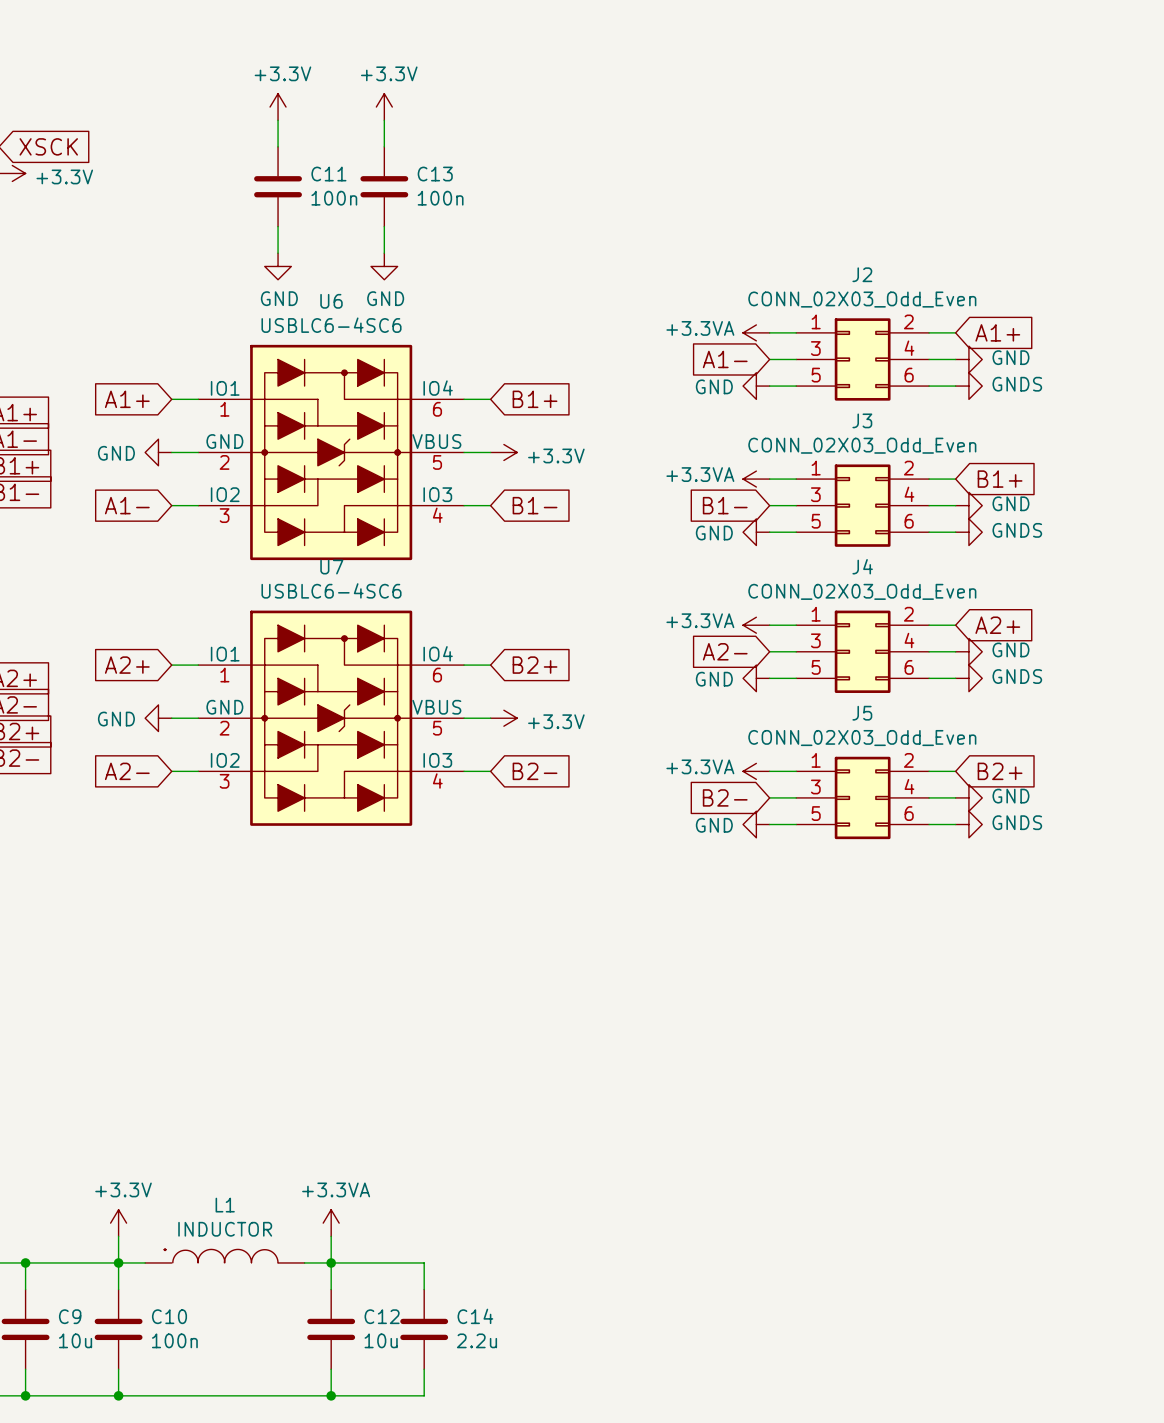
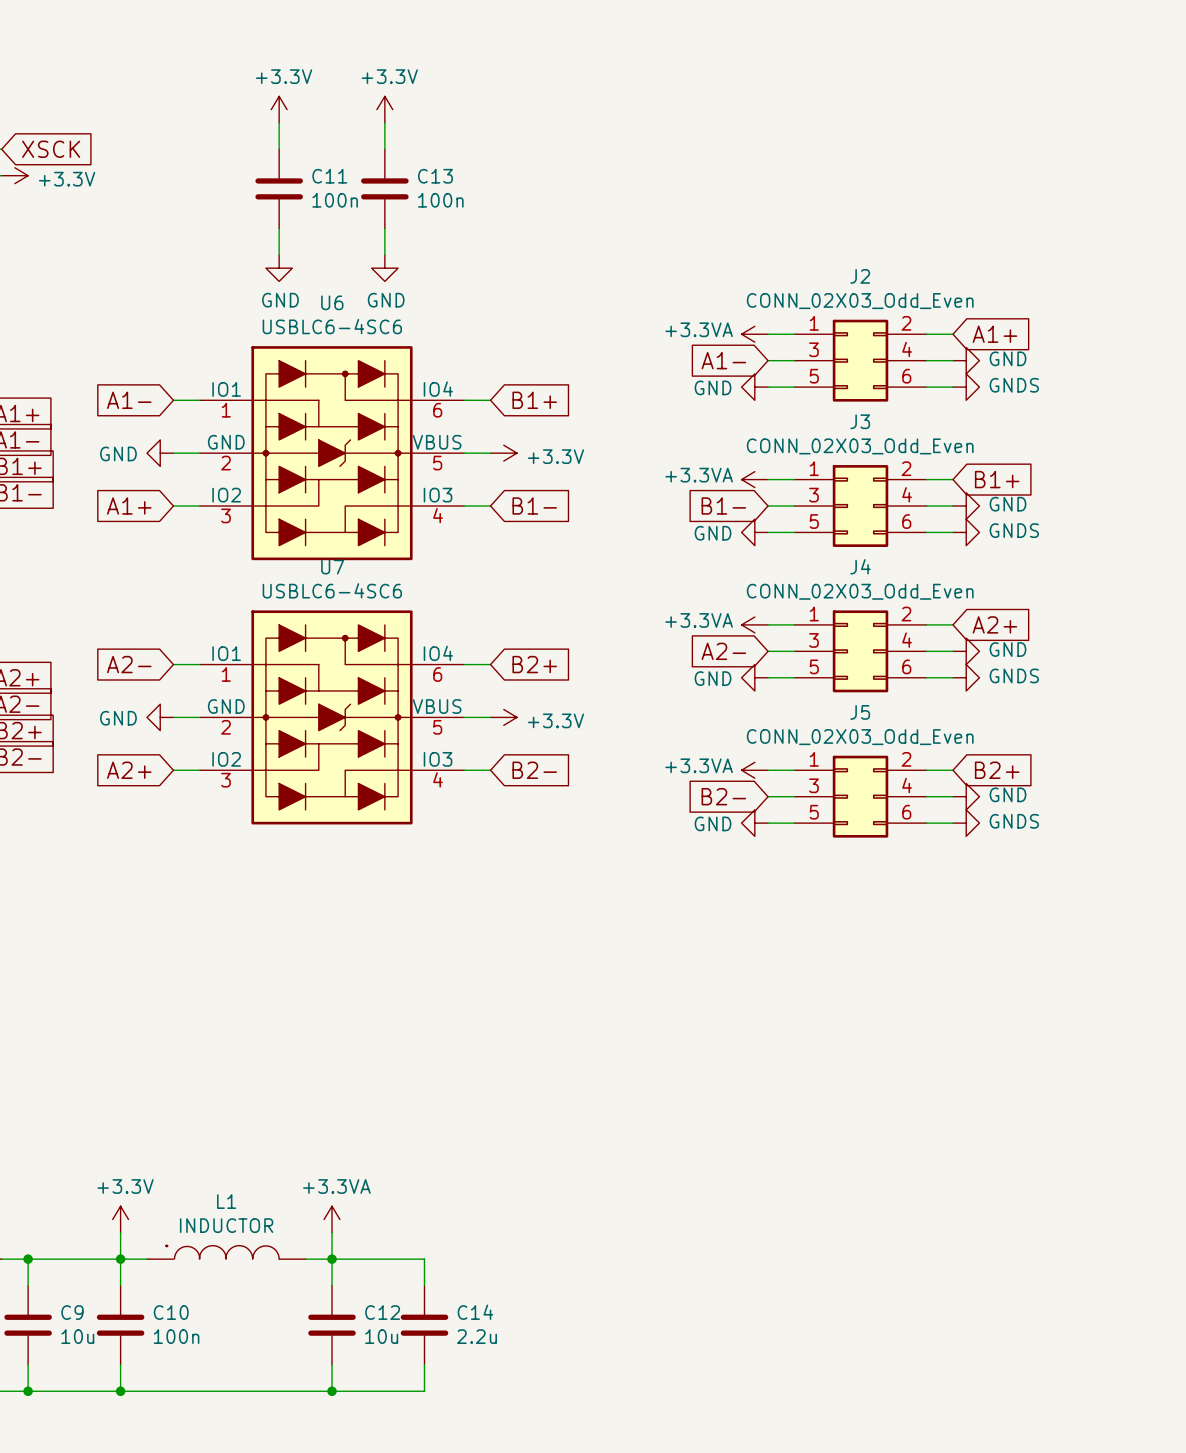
global label: A1+ (127, 399) -> A1- (129, 400)
global label: A1- (127, 505) -> A1+ (129, 506)
global label: A2+ (127, 665) -> A2- (129, 664)
global label: A2- (127, 771) -> A2+ (129, 770)

